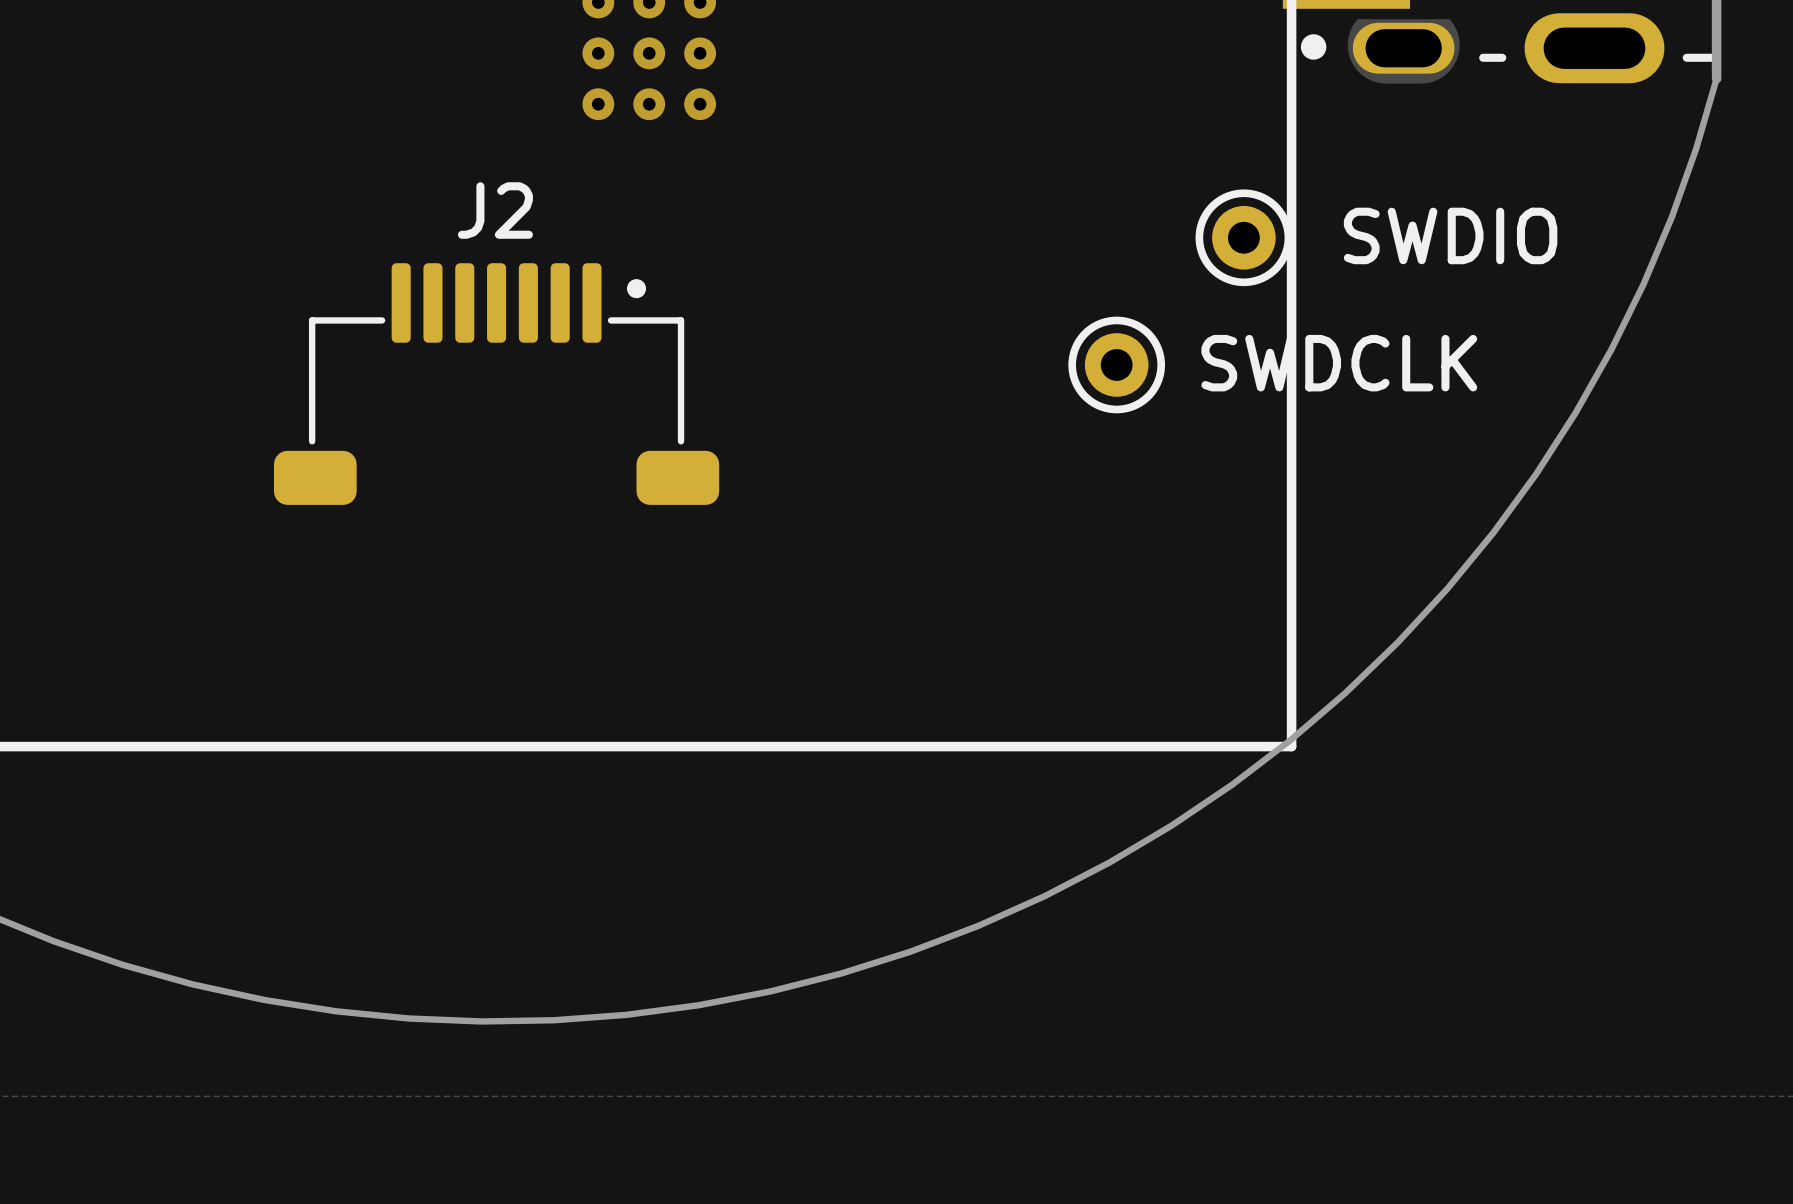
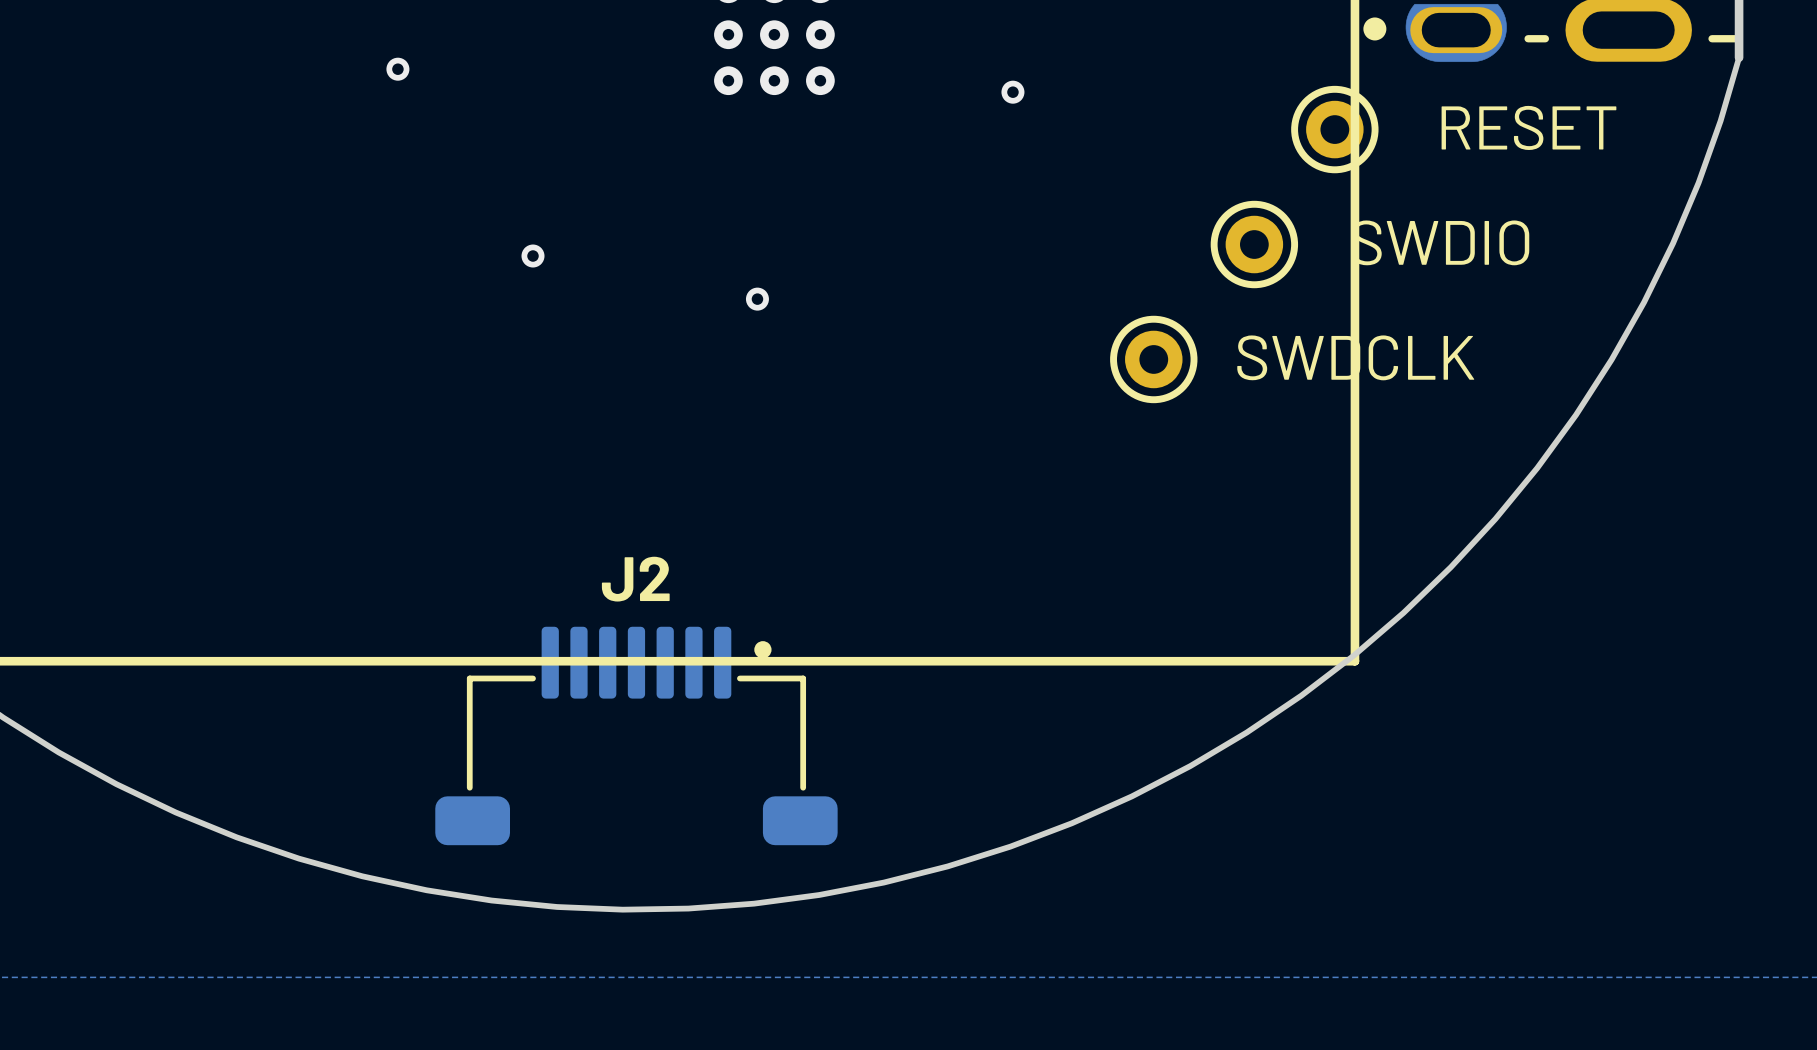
via: none -> (397, 69)
via: none -> (1012, 92)
part: none -> RESET (1334, 129)
part position: (1243, 237) -> (1254, 244)
via: none -> (533, 256)
via: none -> (757, 299)
part position: (1116, 364) -> (1153, 359)
J2 position: (496, 384) -> (636, 735)

